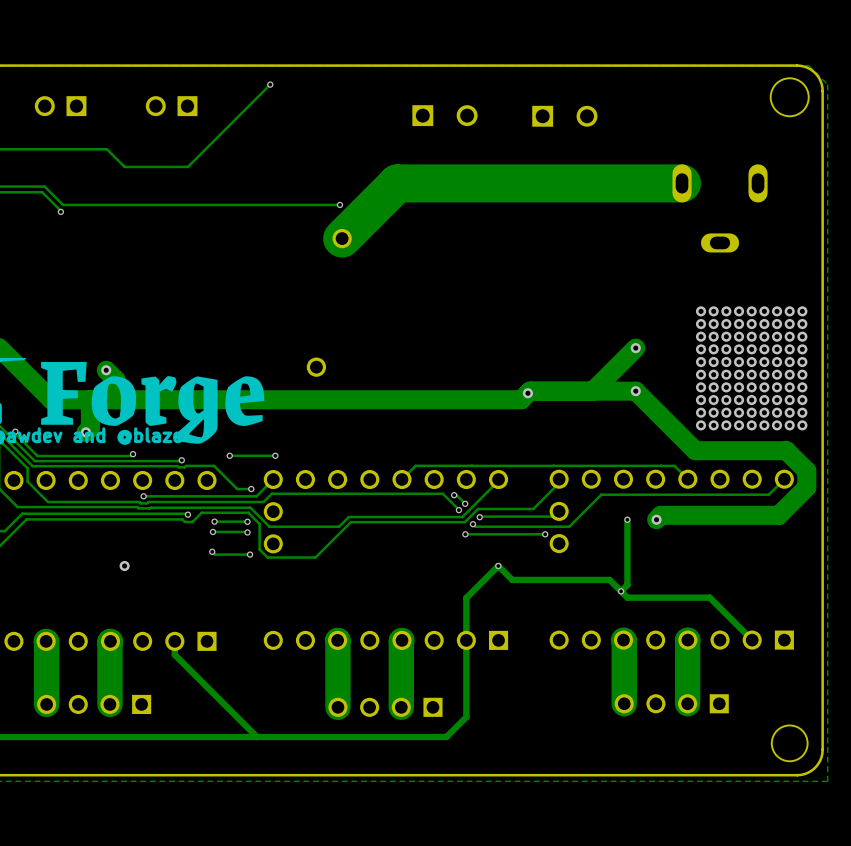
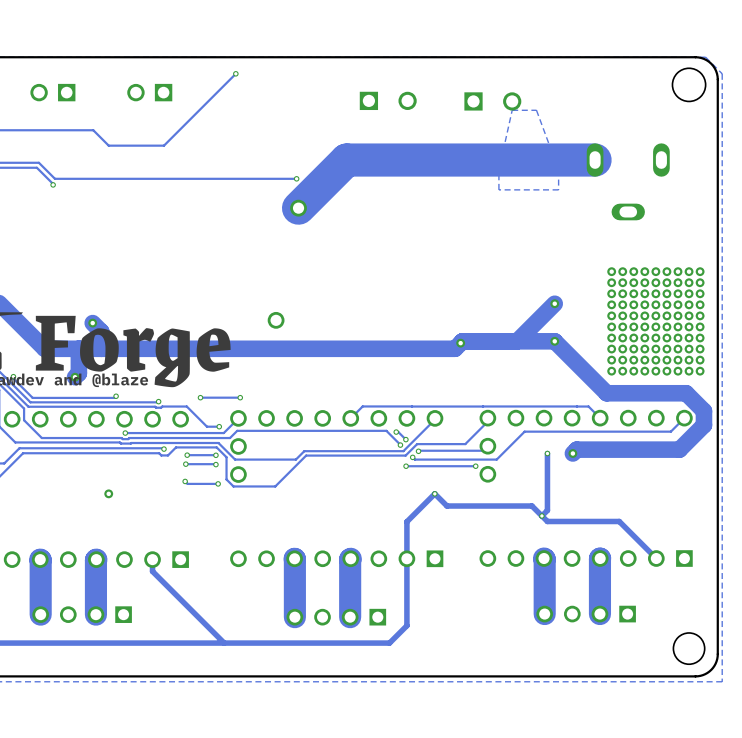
zone outline: none -> (536, 110) (558, 169) (558, 189) (498, 189) (498, 169) (512, 110) (536, 110)

